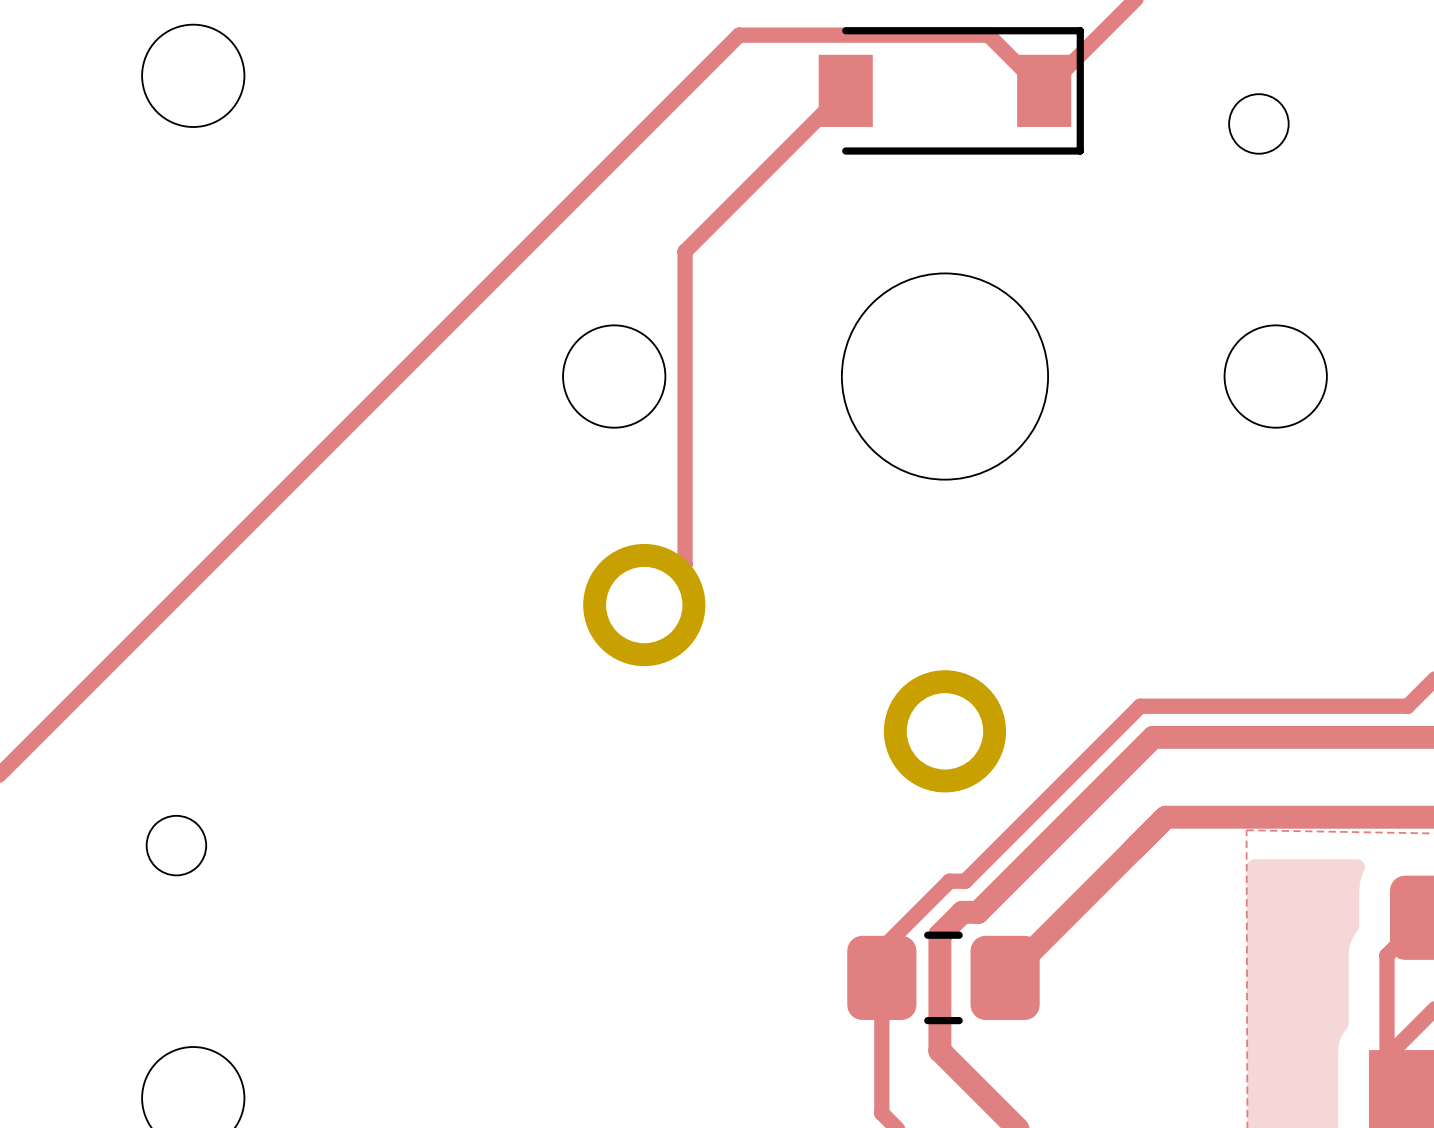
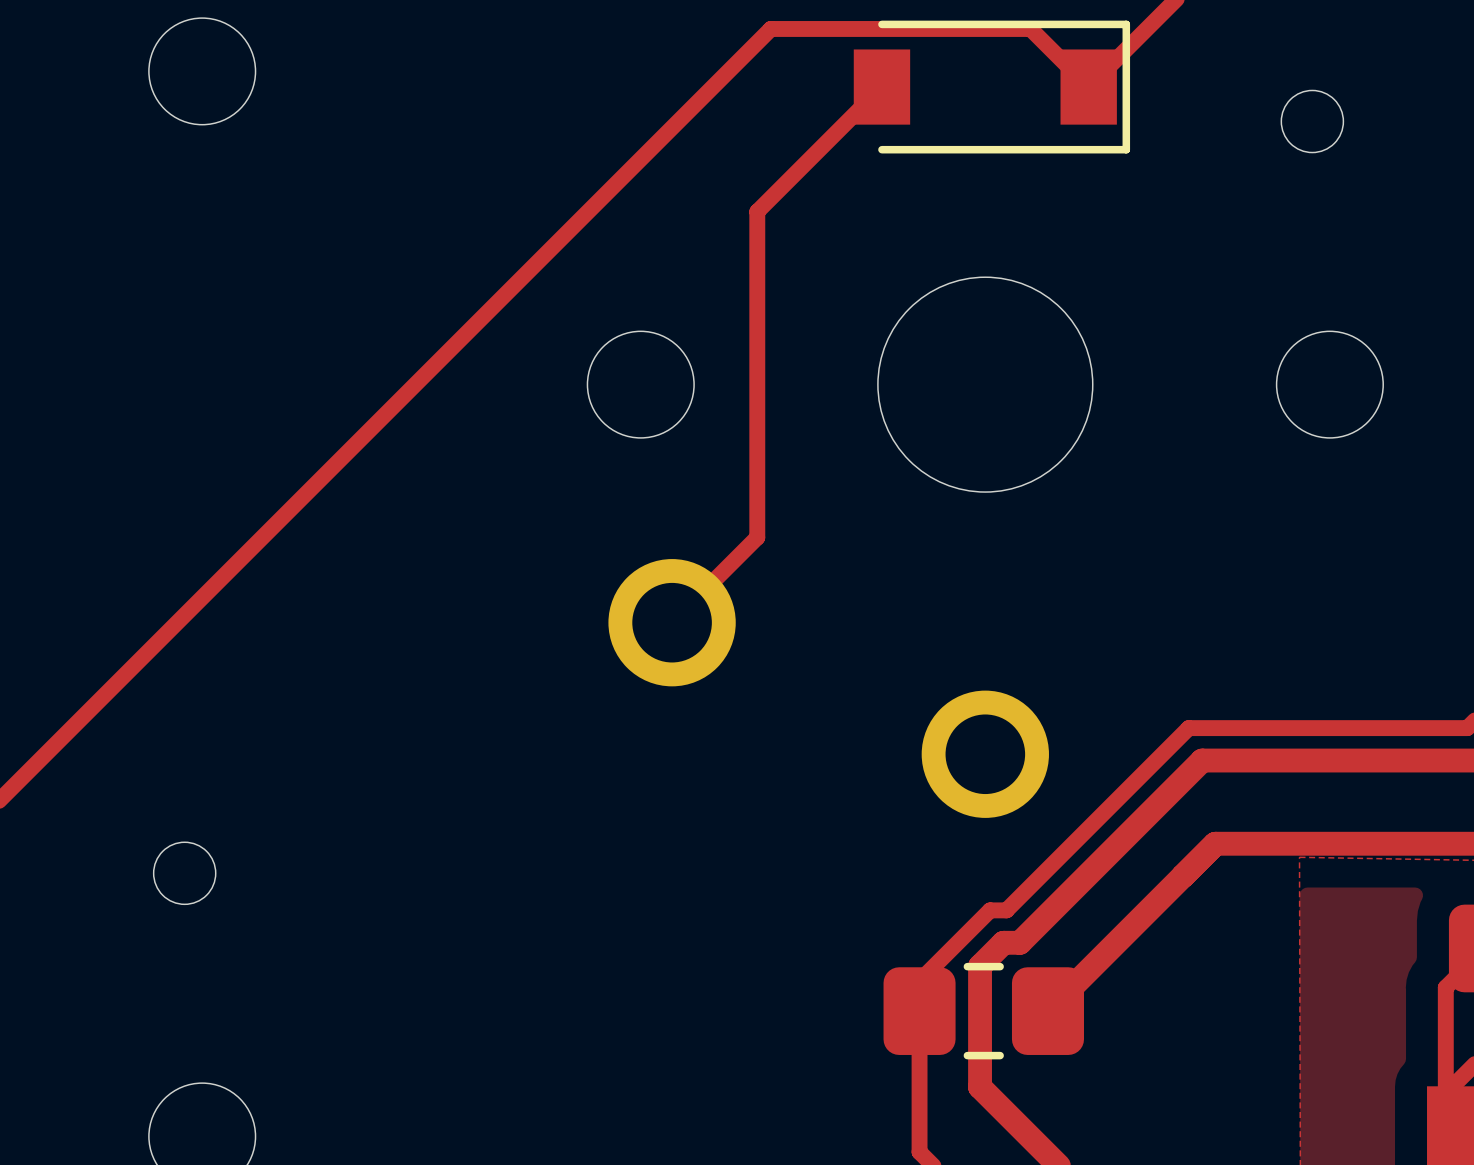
track: (726, 210) (685, 251) (685, 564) -> (757, 211) (757, 537) (714, 580)

